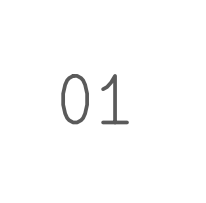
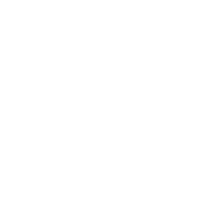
text: 01 (95, 99) -> none

